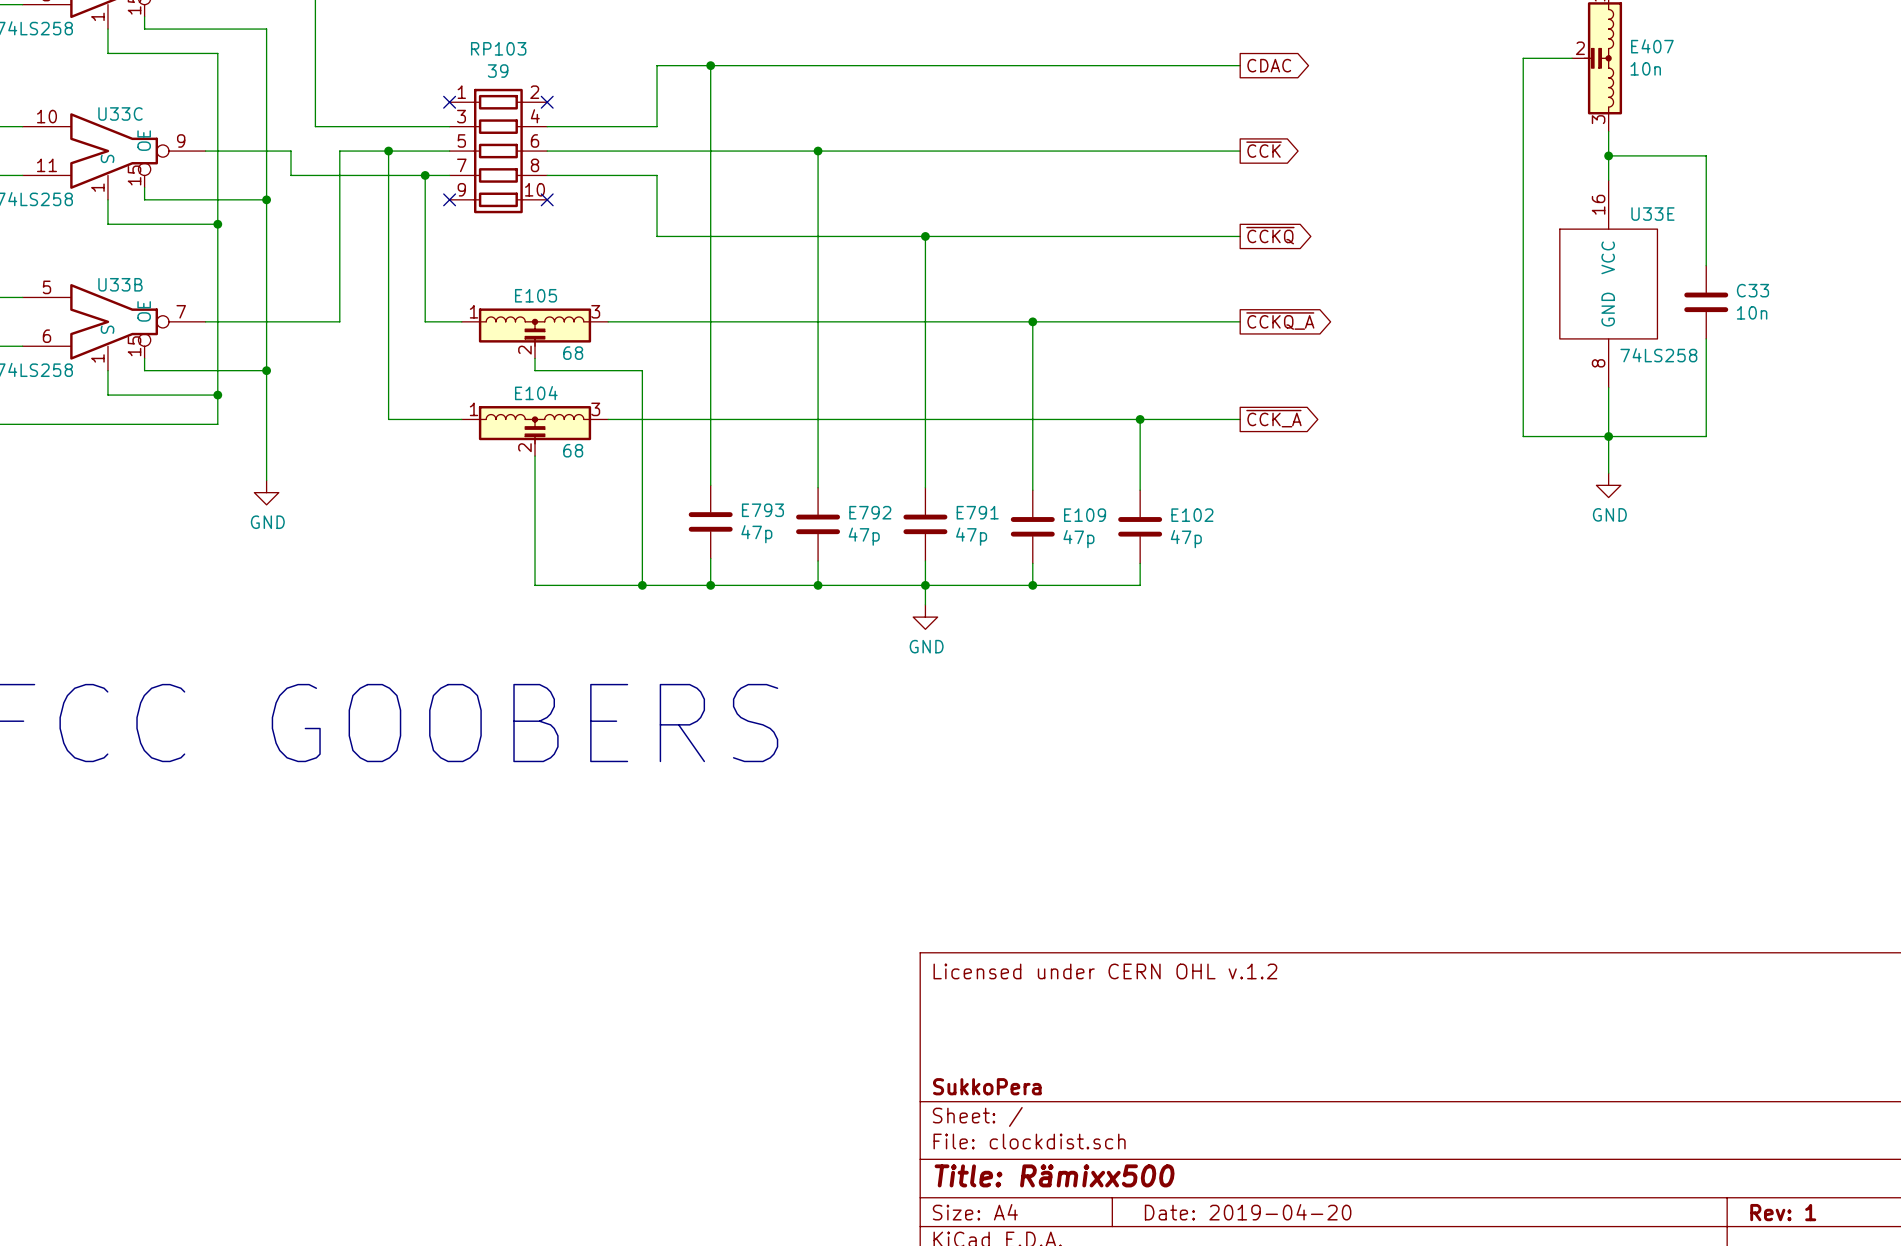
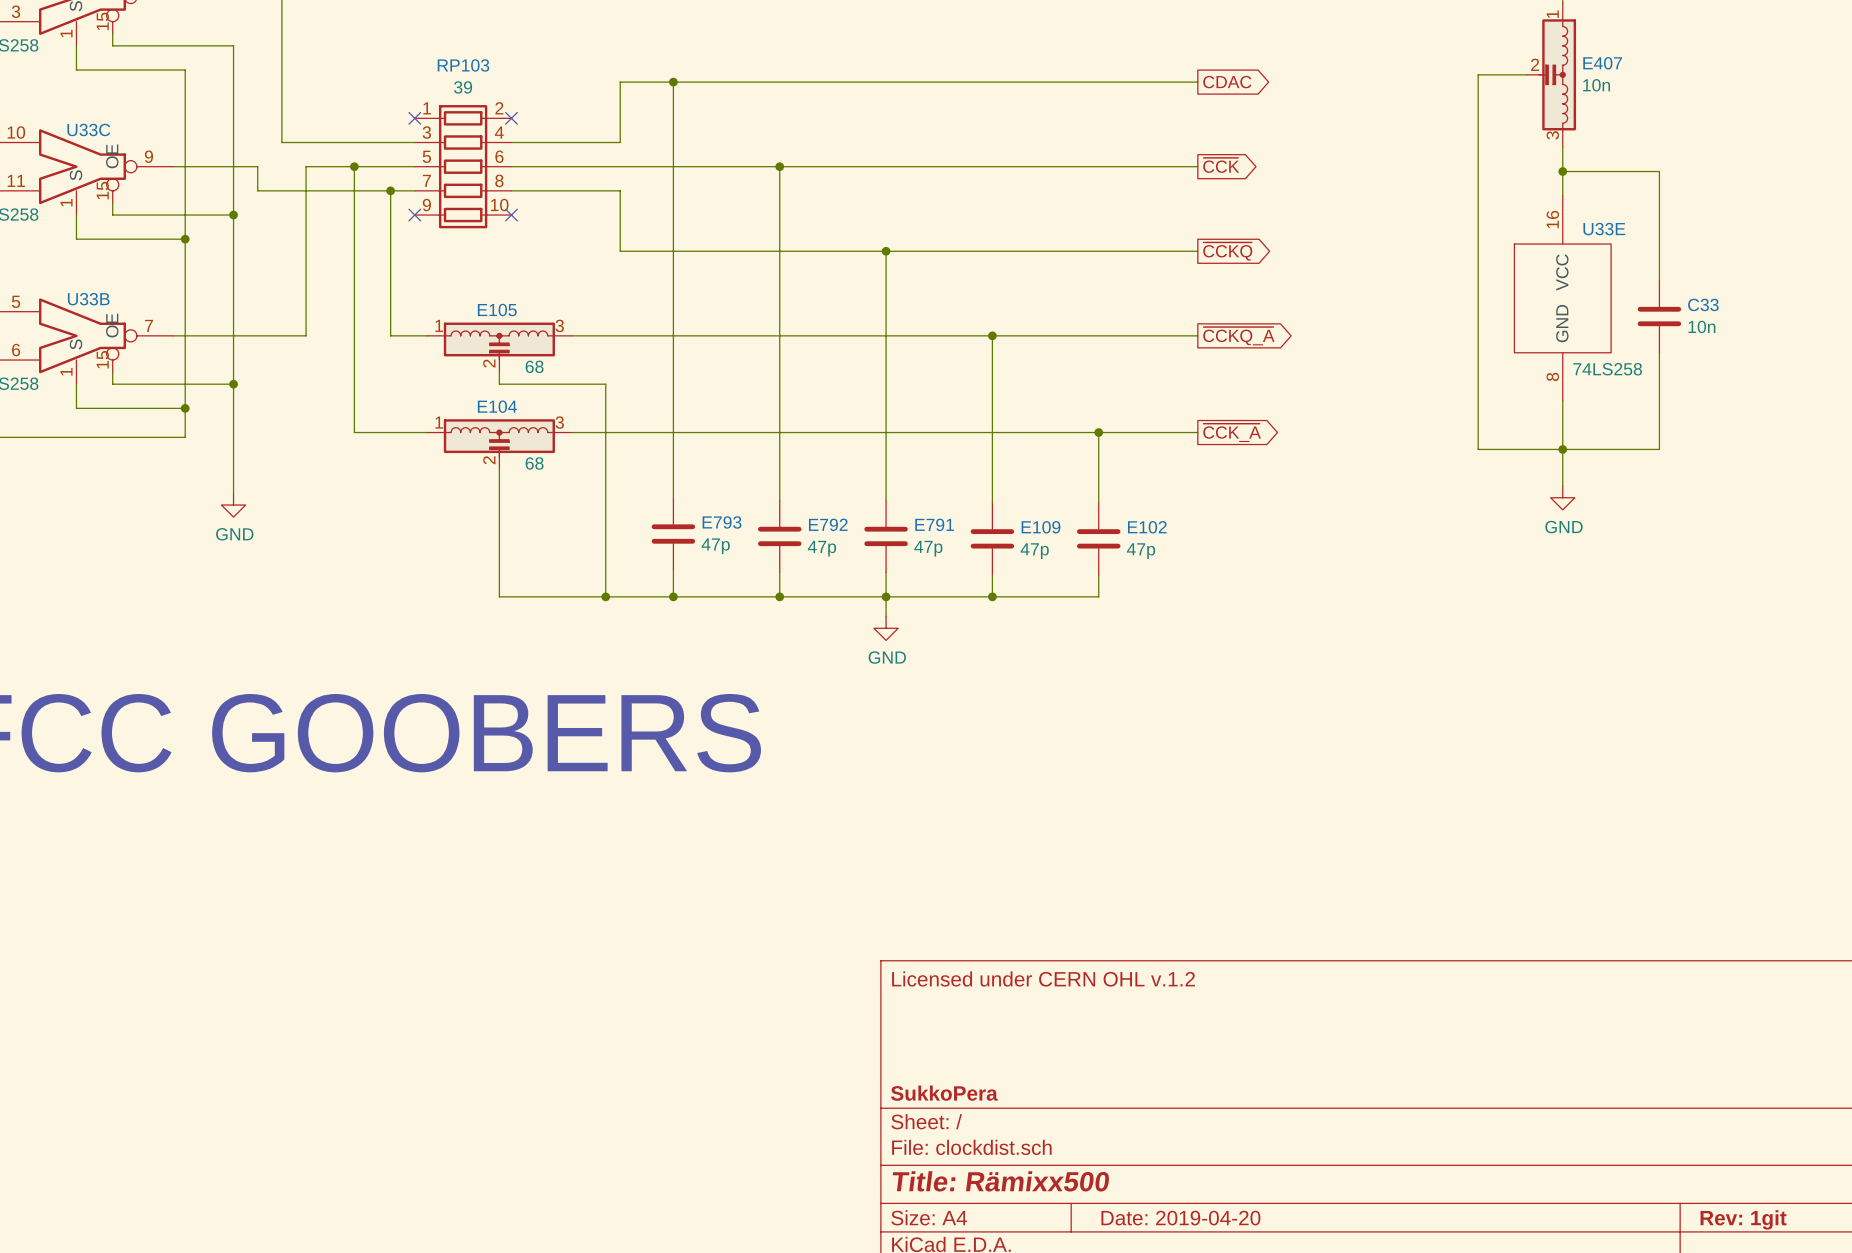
title block: Rev: 1 (1783, 1212) -> Rev: 1git (1743, 1219)

